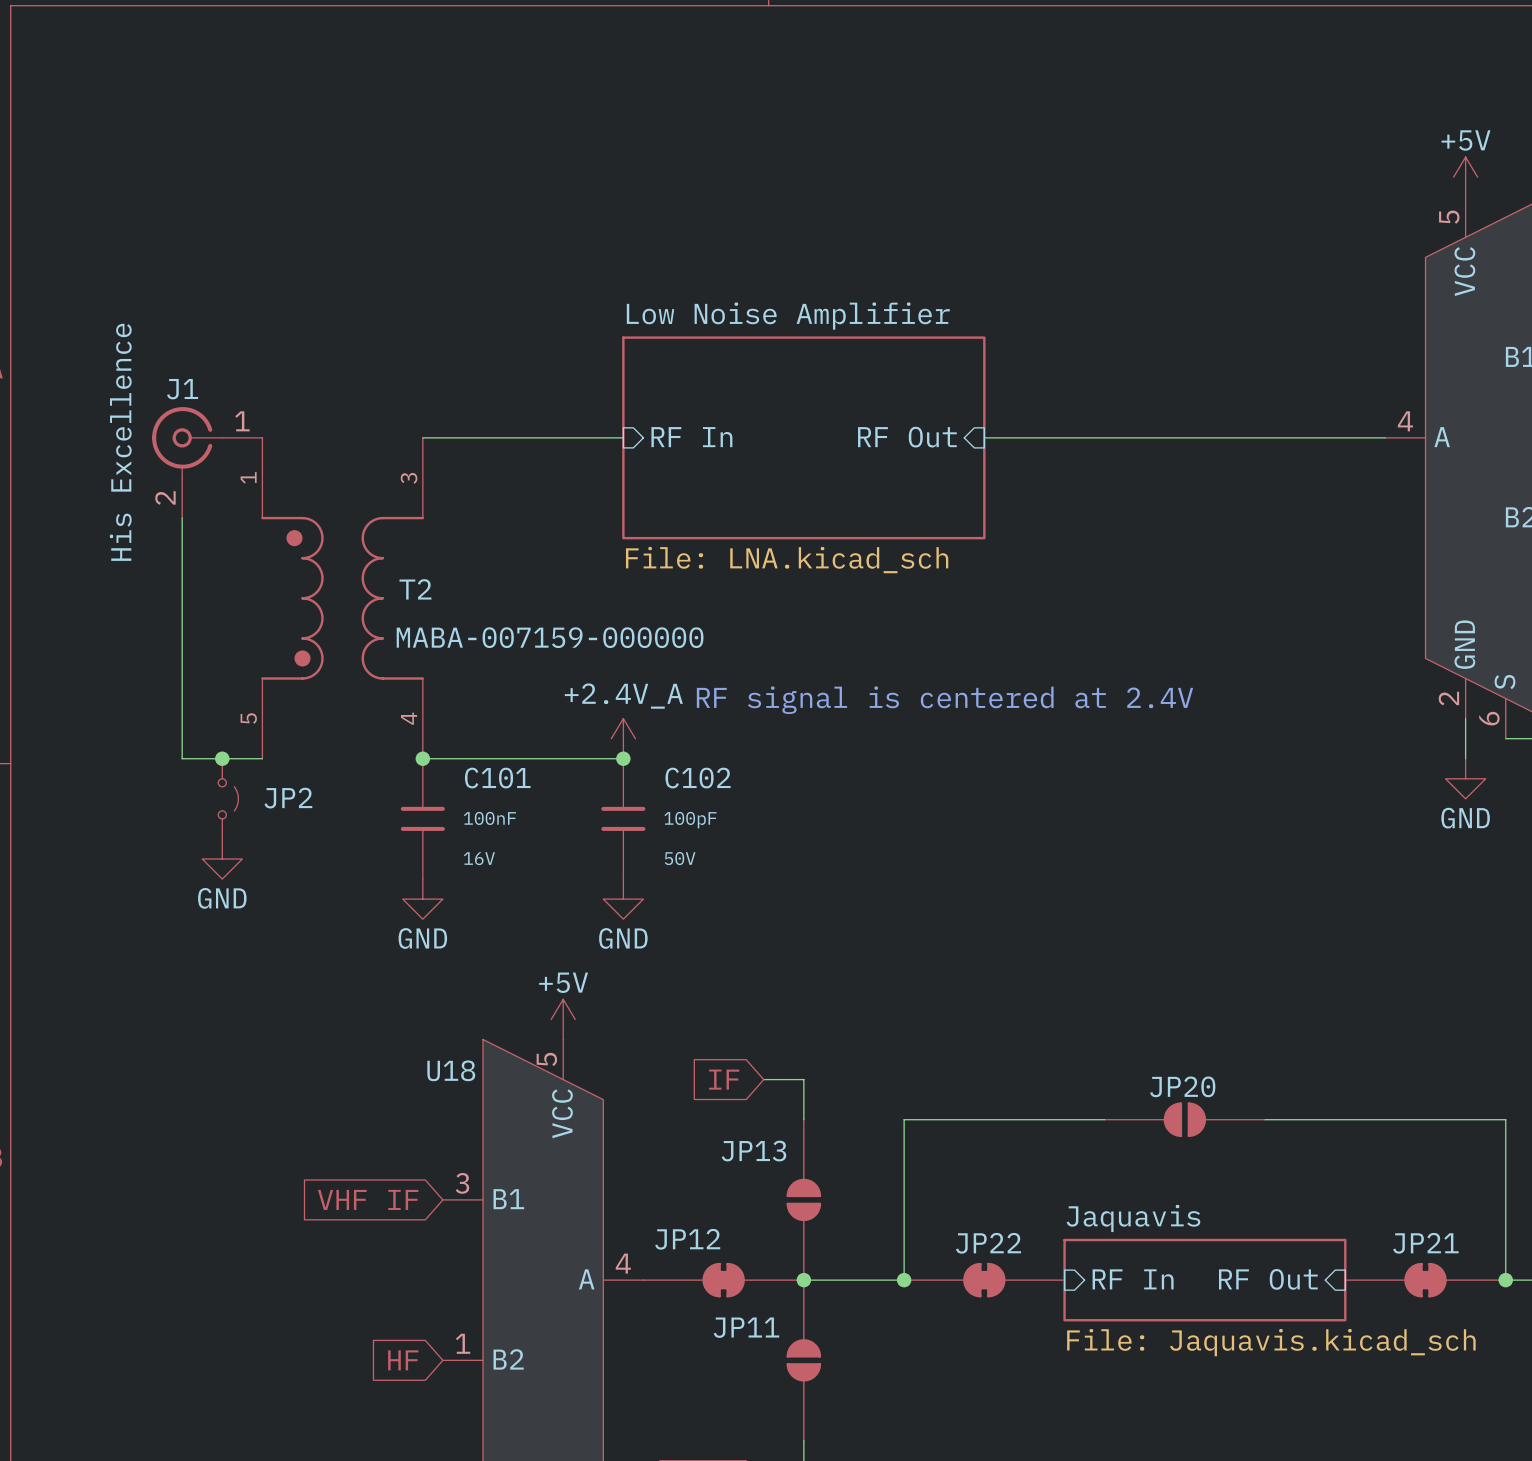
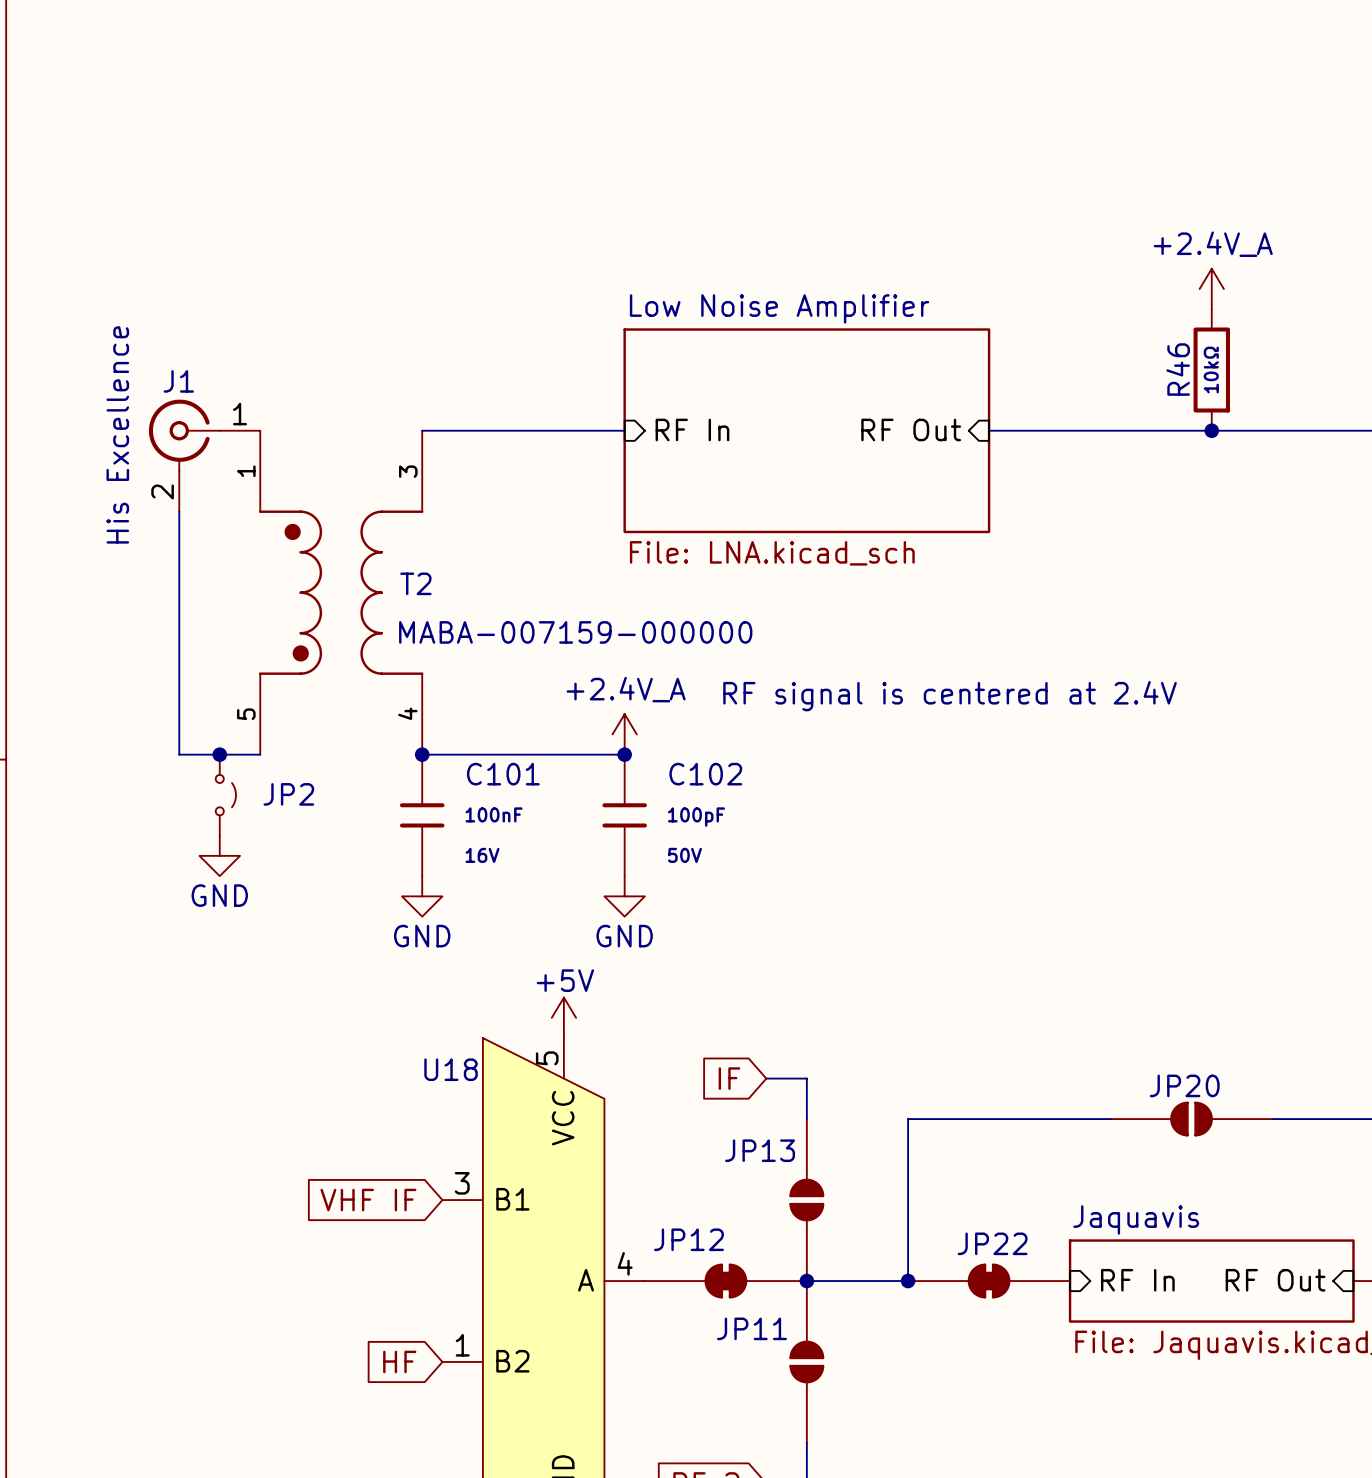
power symbol: none -> +2.4V_A (1211, 289)
R46: none -> 10kΩ (1211, 370)
junction: none -> (1211, 430)

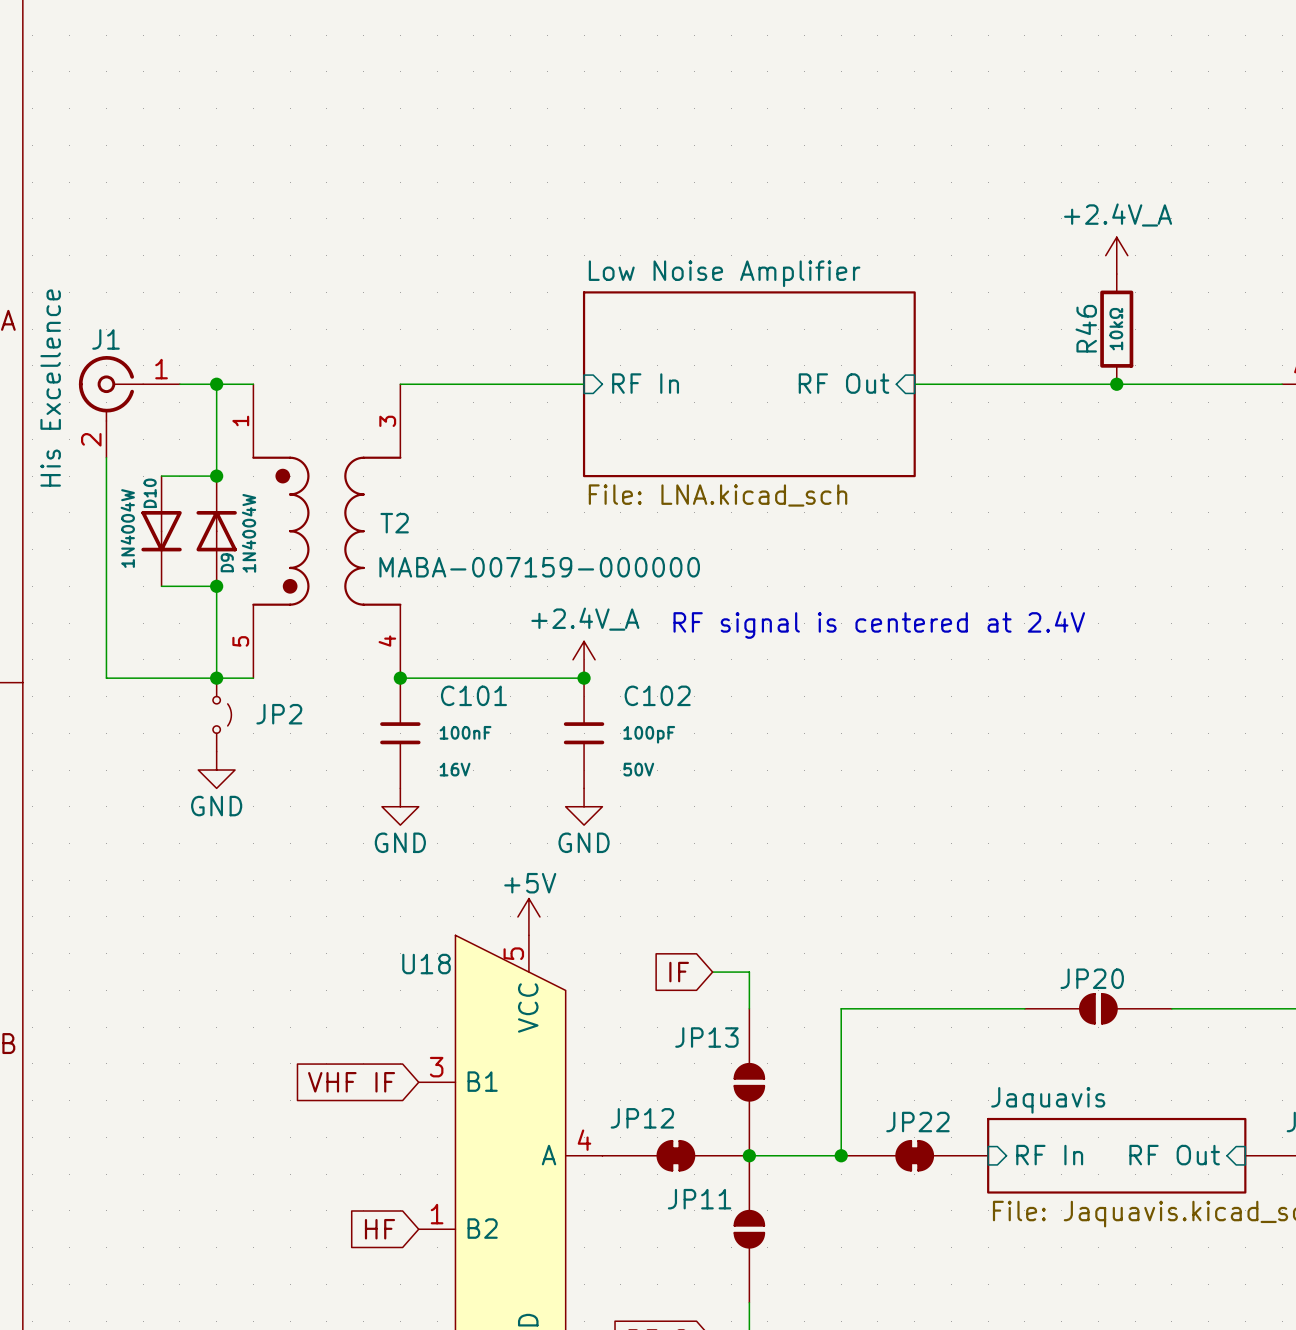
wire: none -> (216, 384) (216, 476) (161, 476)
junction: none -> (216, 384)
J1 position: (204, 455) -> (129, 406)
wire: (179, 511) (179, 754) -> (106, 457) (106, 678) (179, 678)
junction: none -> (216, 476)
D10: none -> 1N4004W (161, 531)
D9: none -> 1N4004W (216, 531)
wire: none -> (161, 586) (216, 586) (216, 678)
junction: none -> (216, 586)

